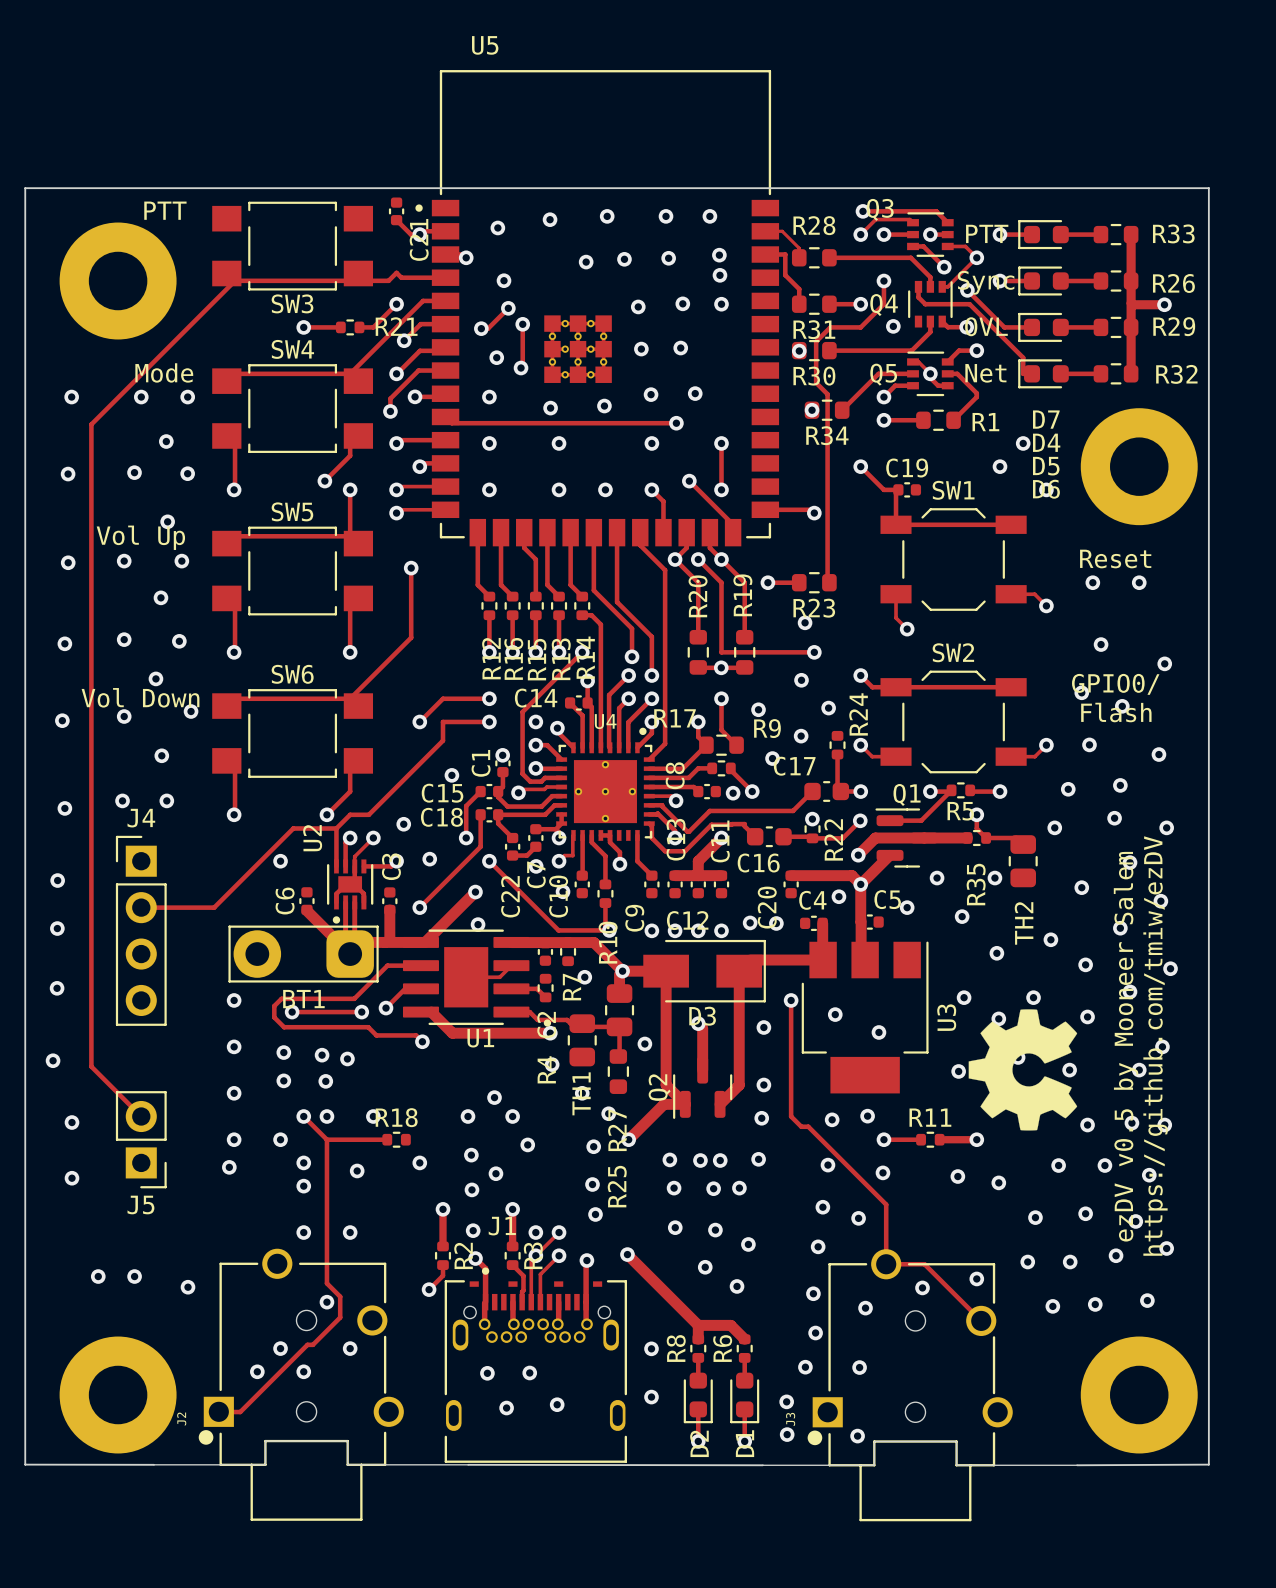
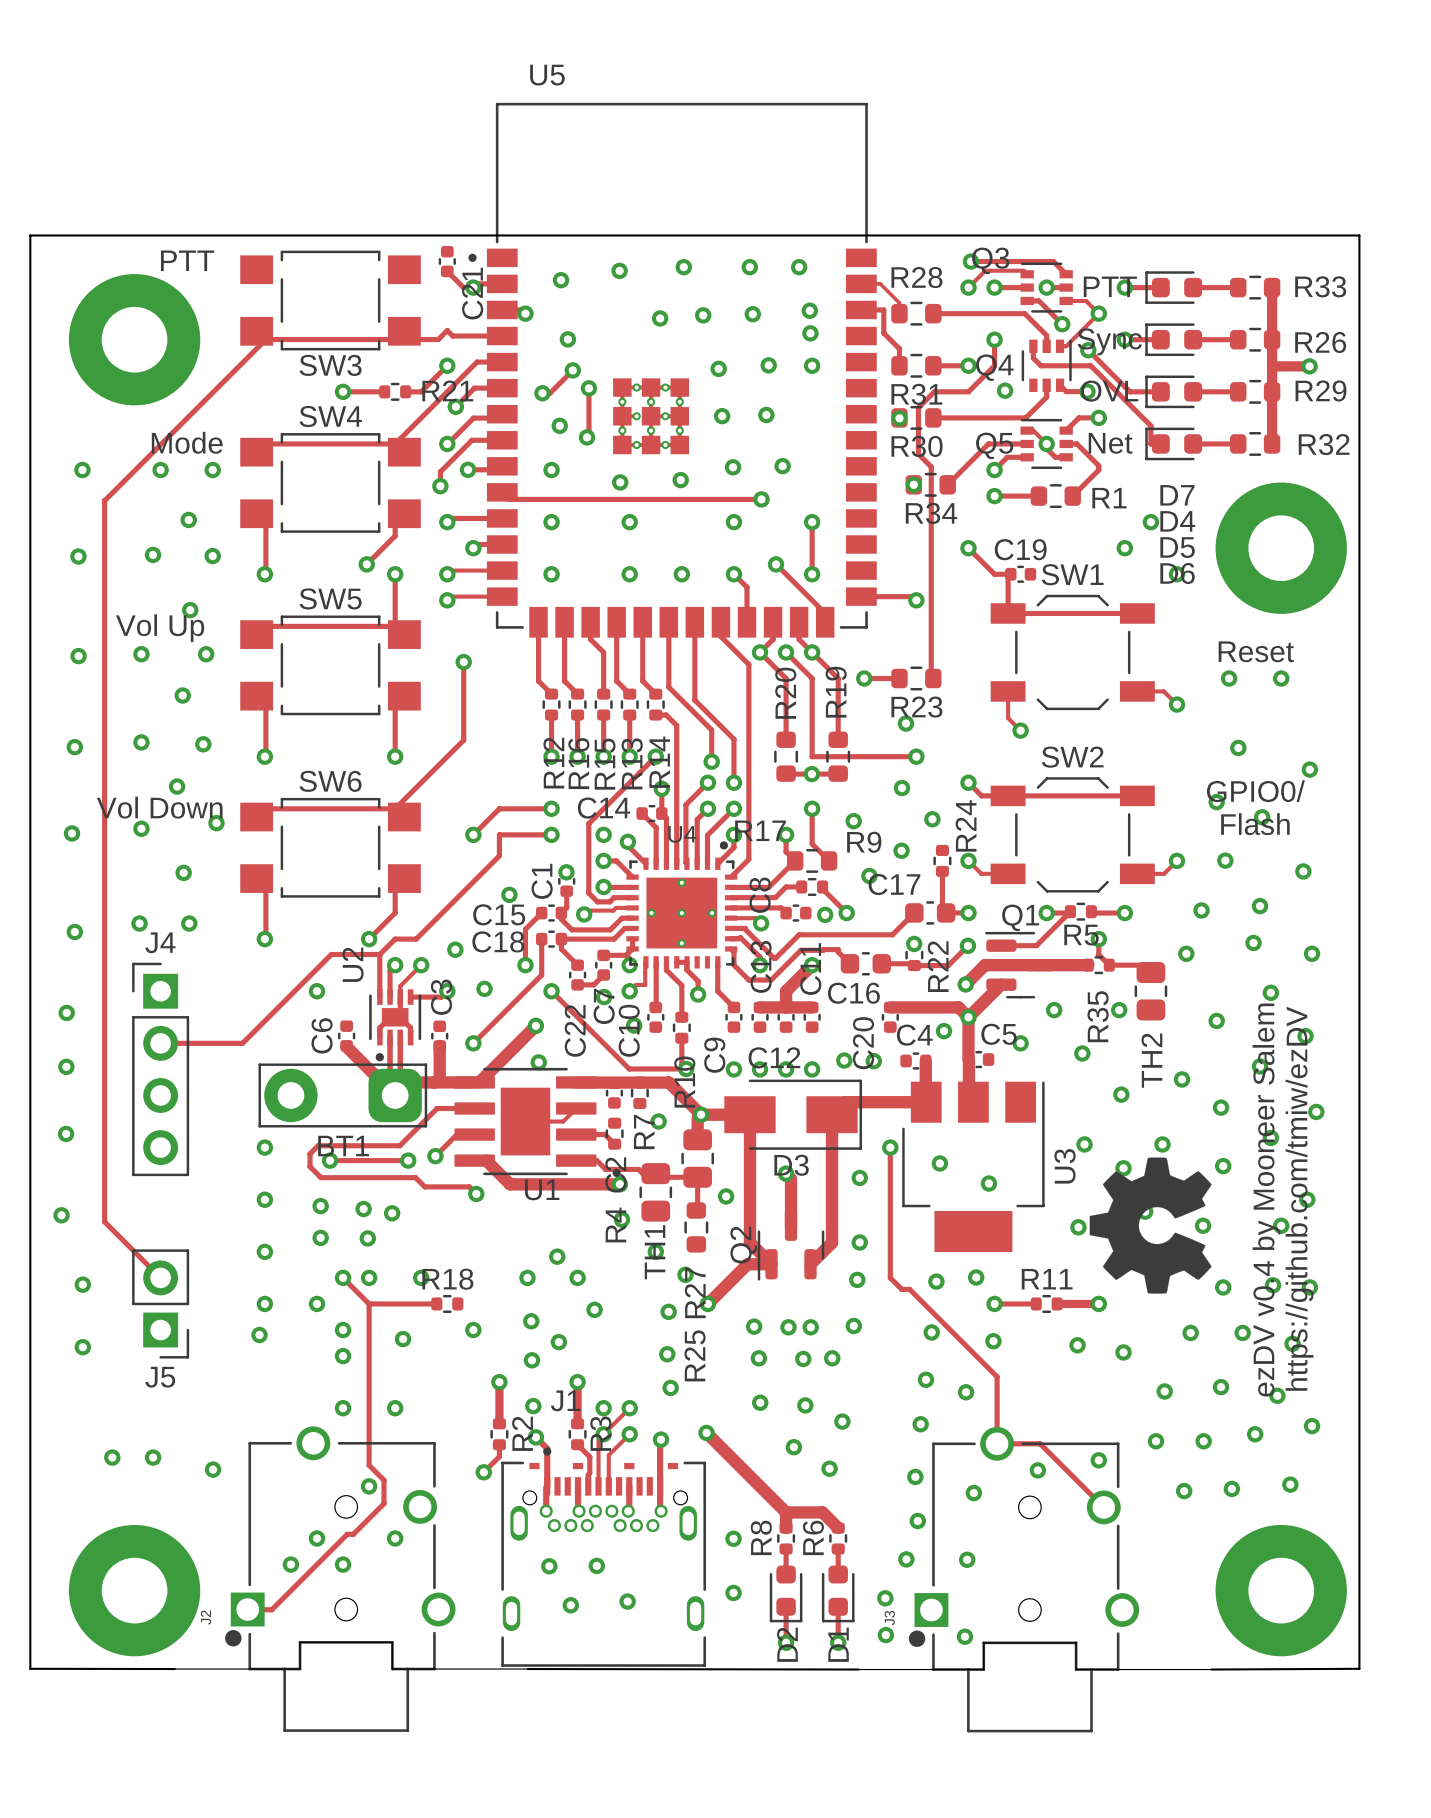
text: ezDV v0.5 by Mooneer Salem (1126, 1046) -> ezDV v0.4 by Mooneer Salem (1266, 1200)

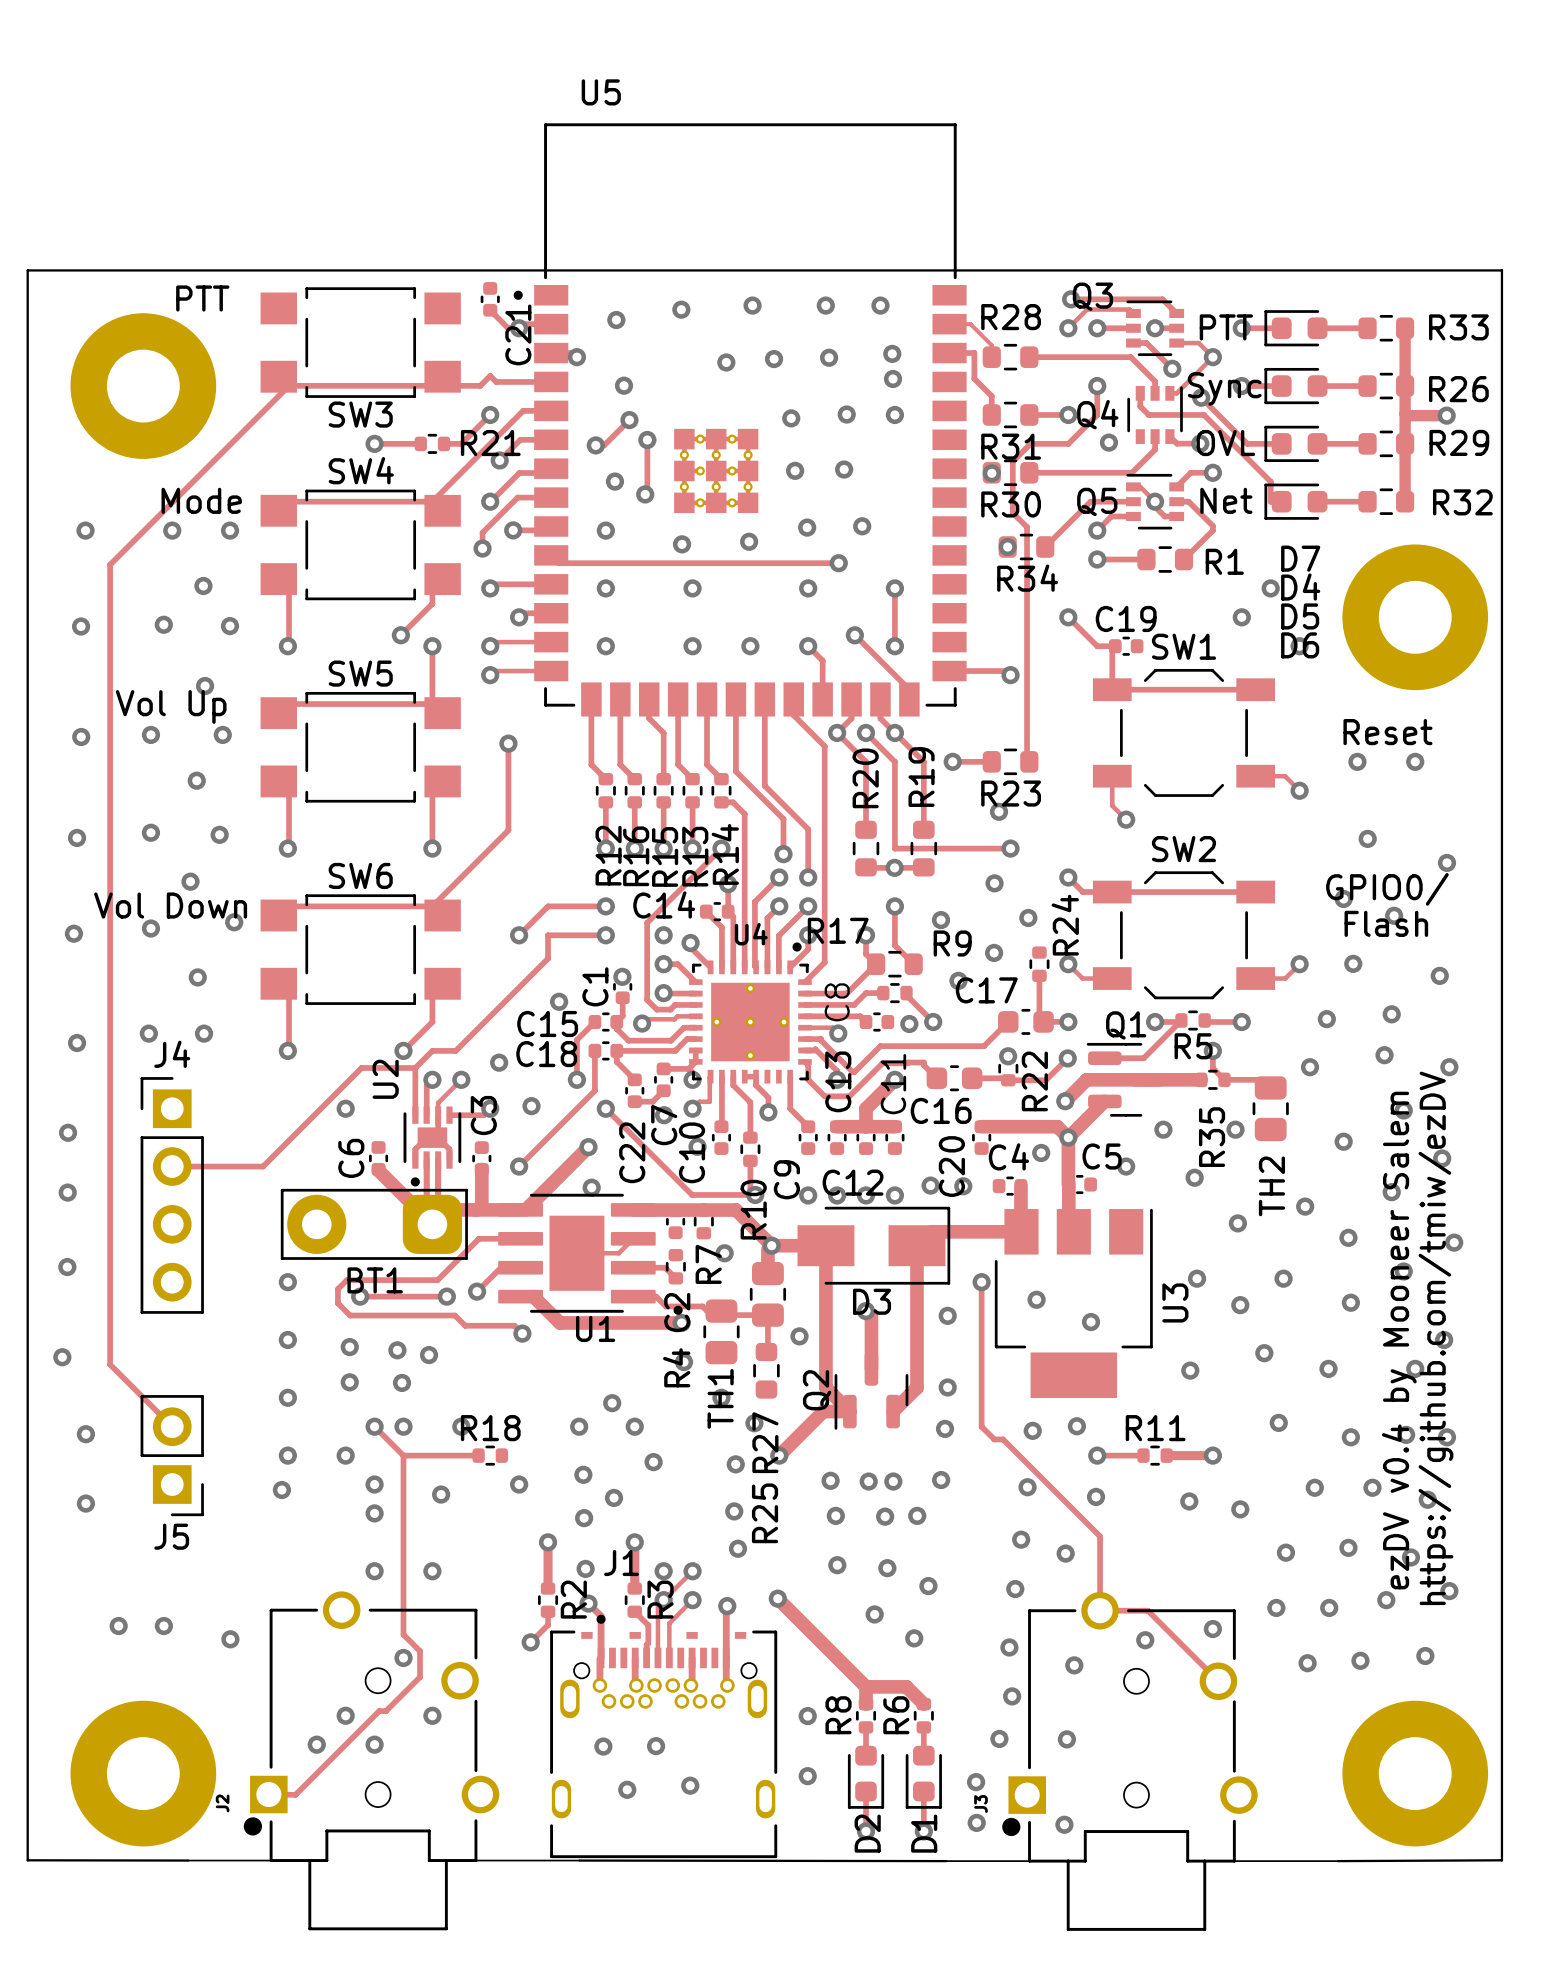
drawing: [1089, 1157, 1212, 1294] -> none

